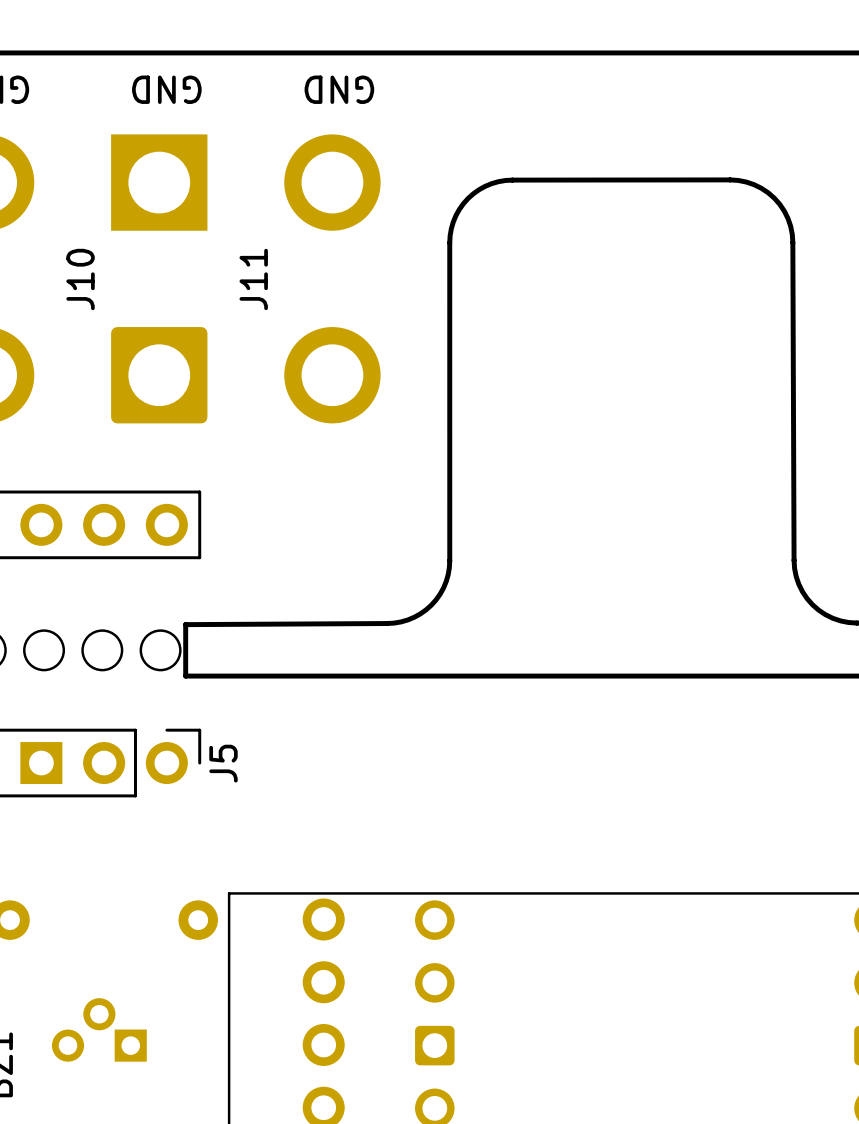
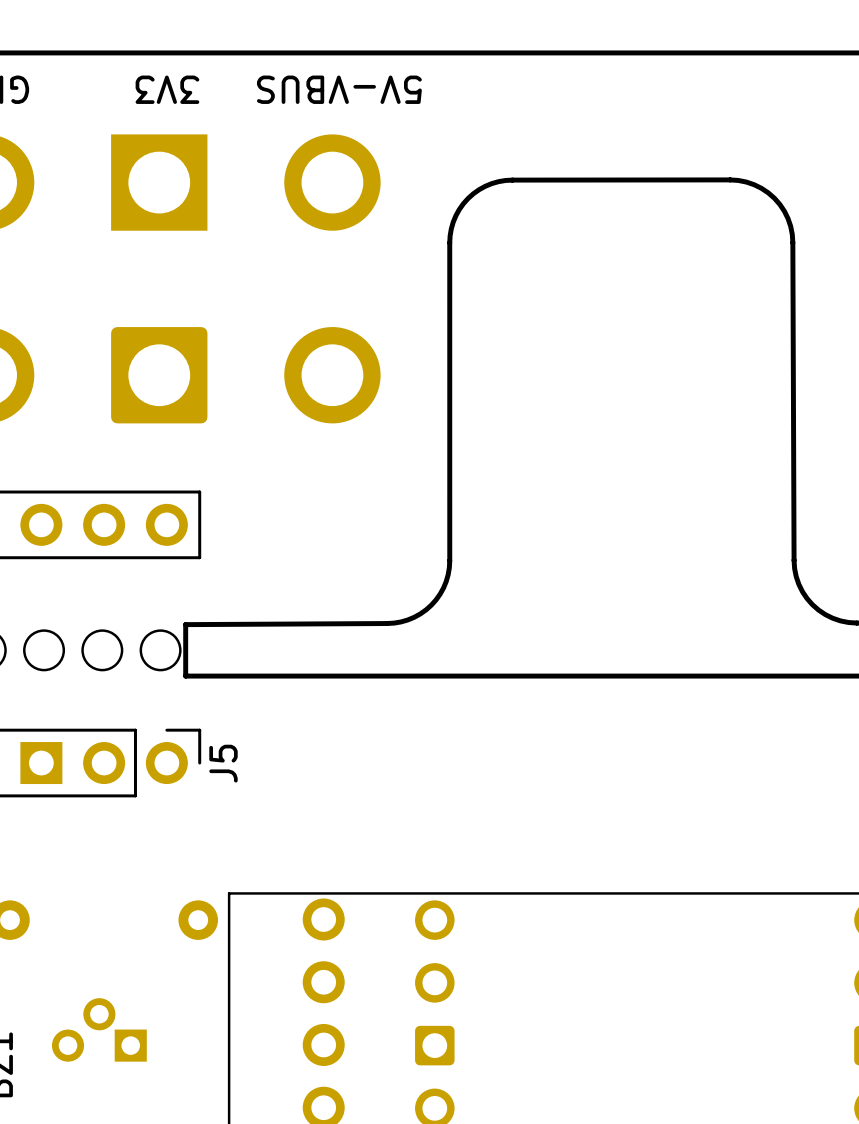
J10 value: GND (166, 89) -> 3V3 (167, 89)
J11 value: GND (339, 89) -> 5V-VBUS (339, 89)
J10 name: J10 (80, 279) -> none
J11 name: J11 (253, 279) -> none

